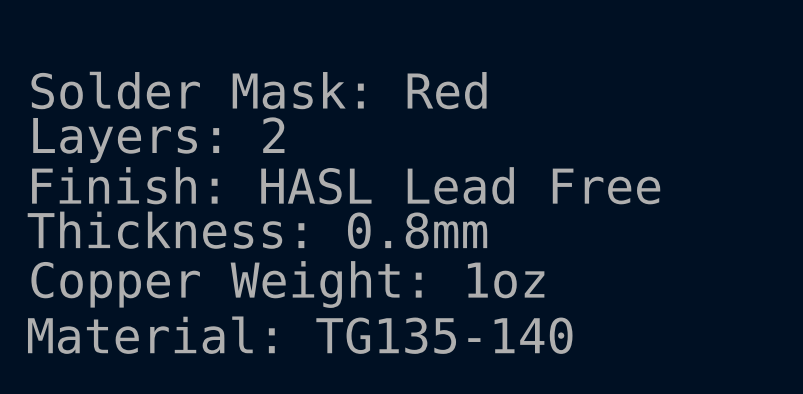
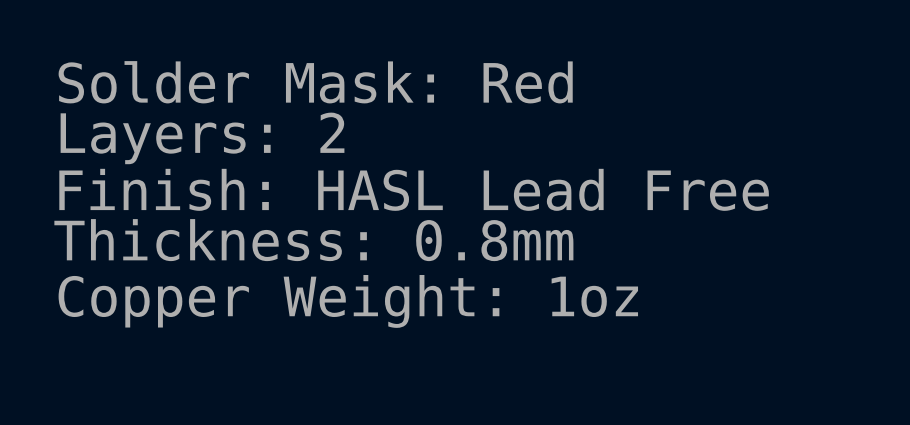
text: Material: TG135-140 (300, 335) -> none

